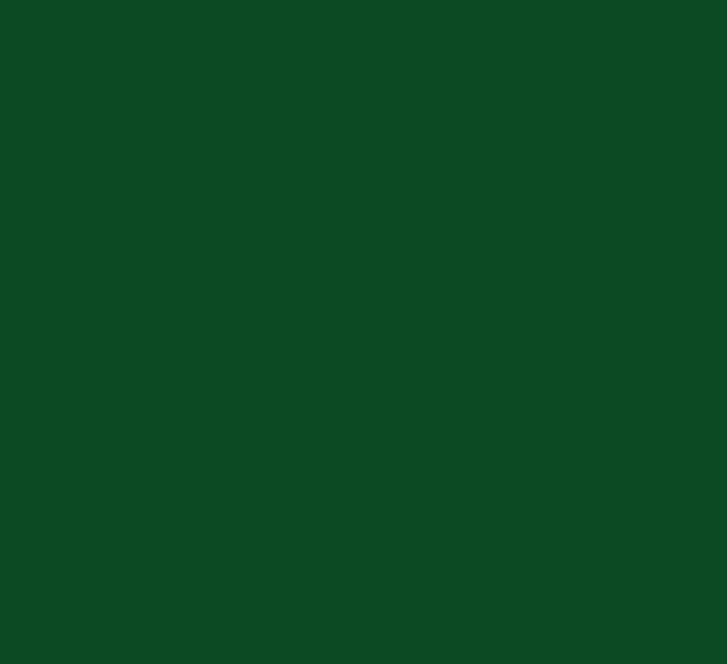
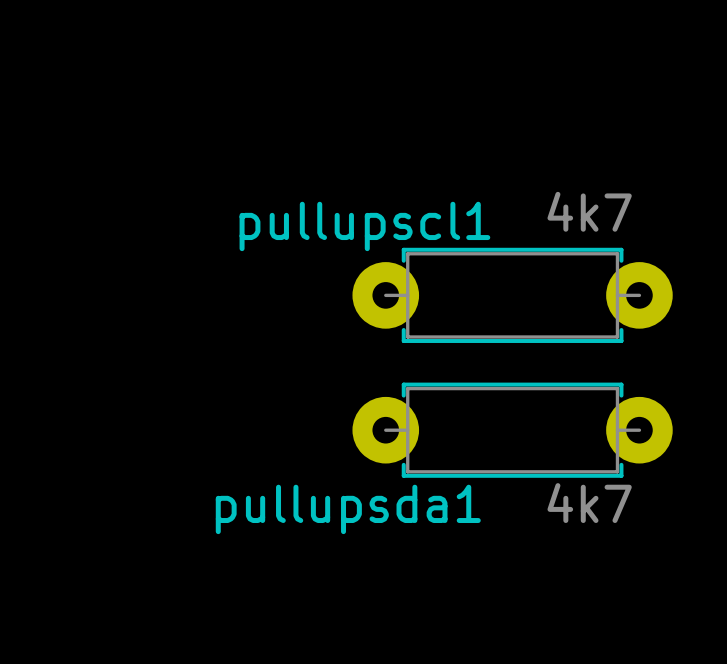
pullupscl1: none -> 4k7 (512, 295)
pullupsda1: none -> 4k7 (512, 430)

